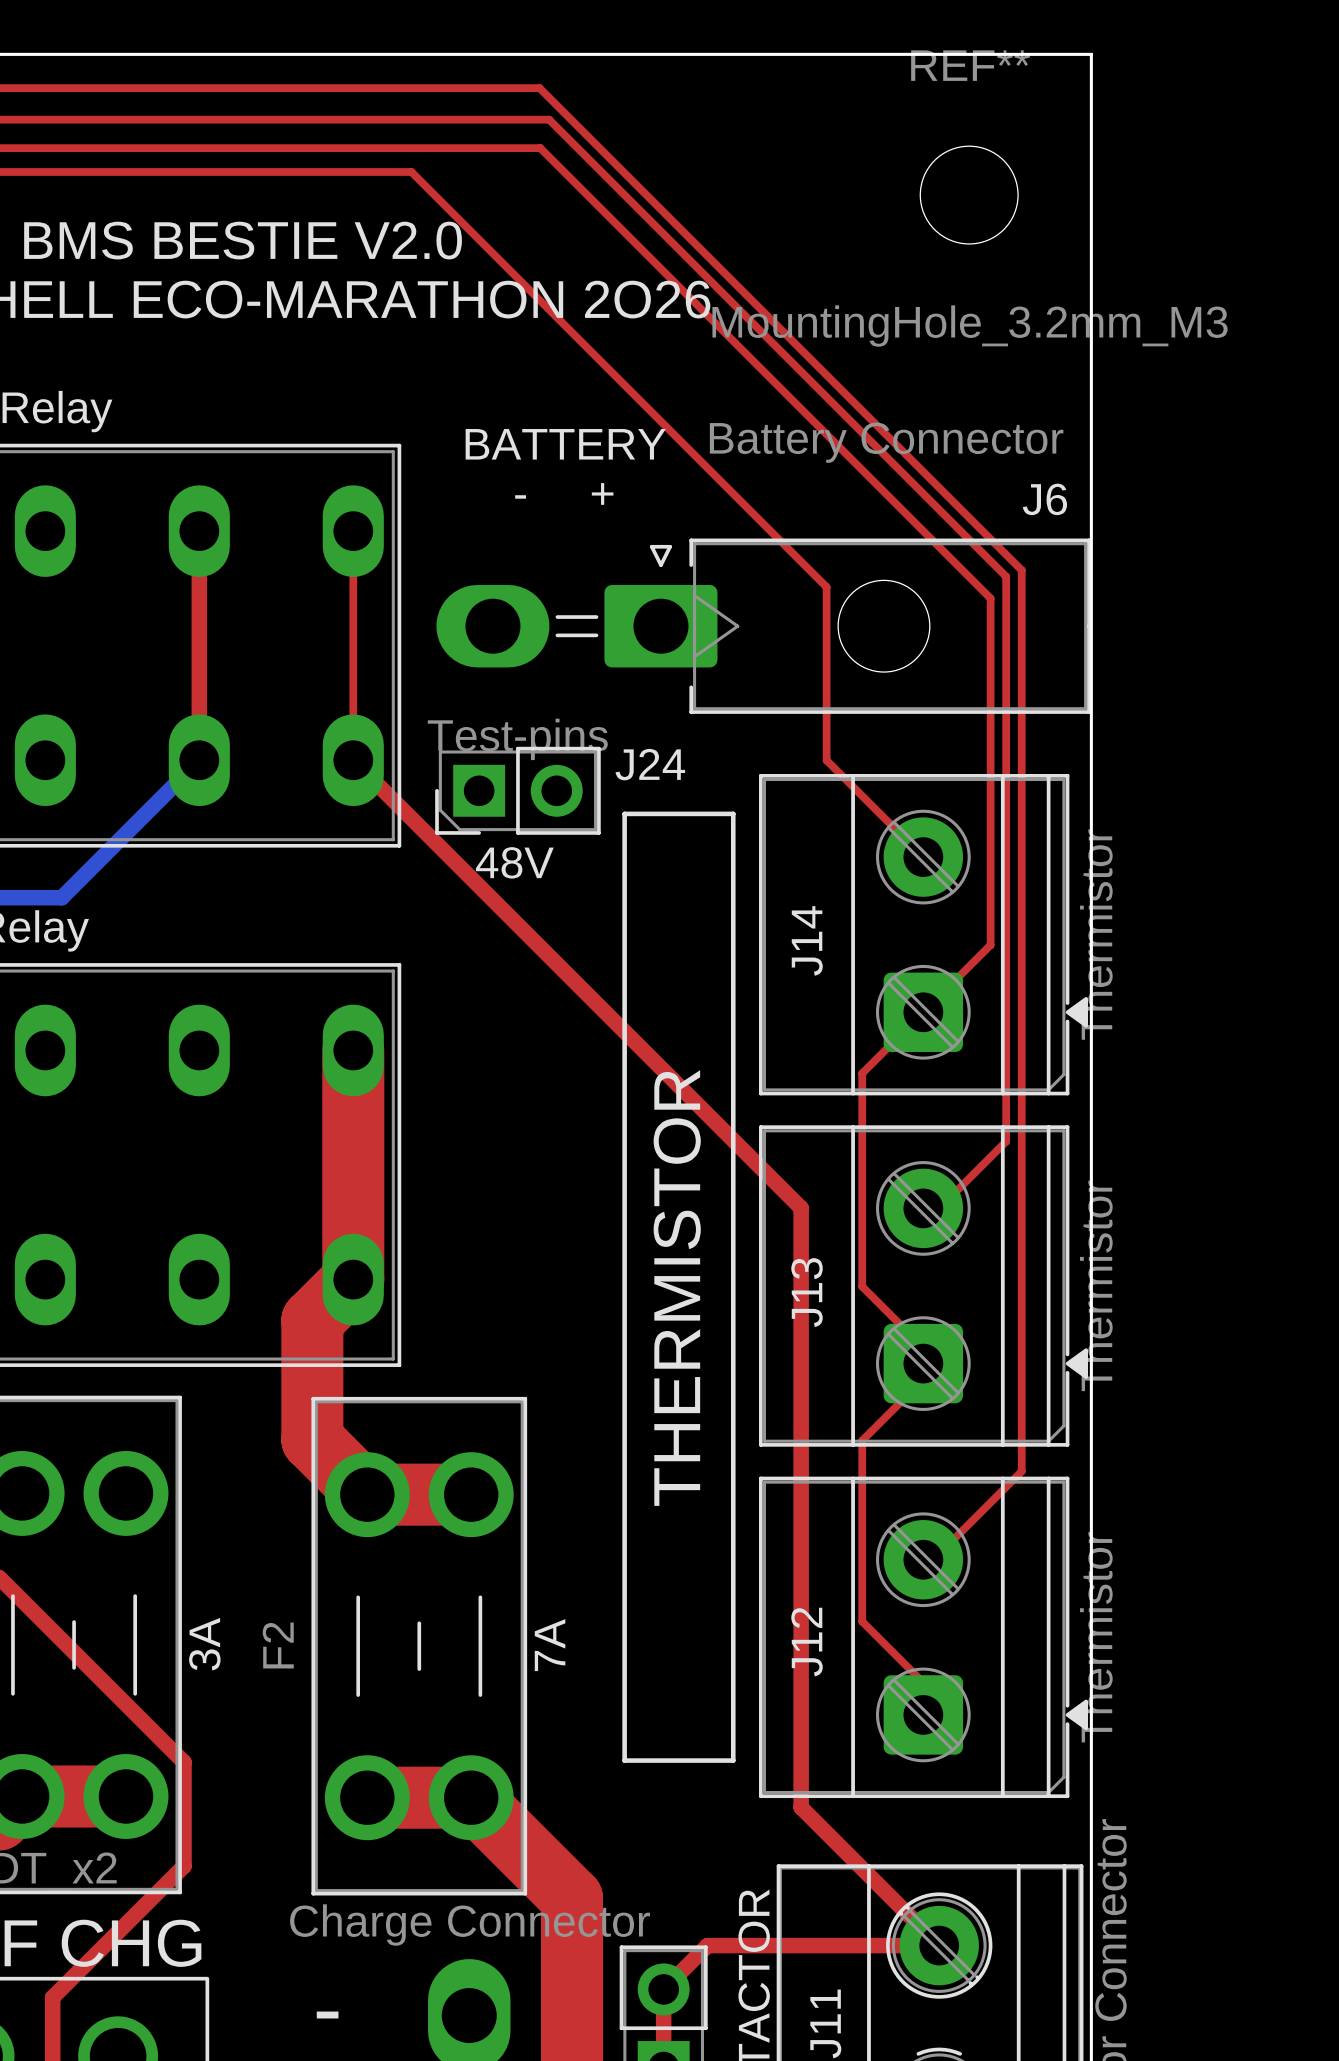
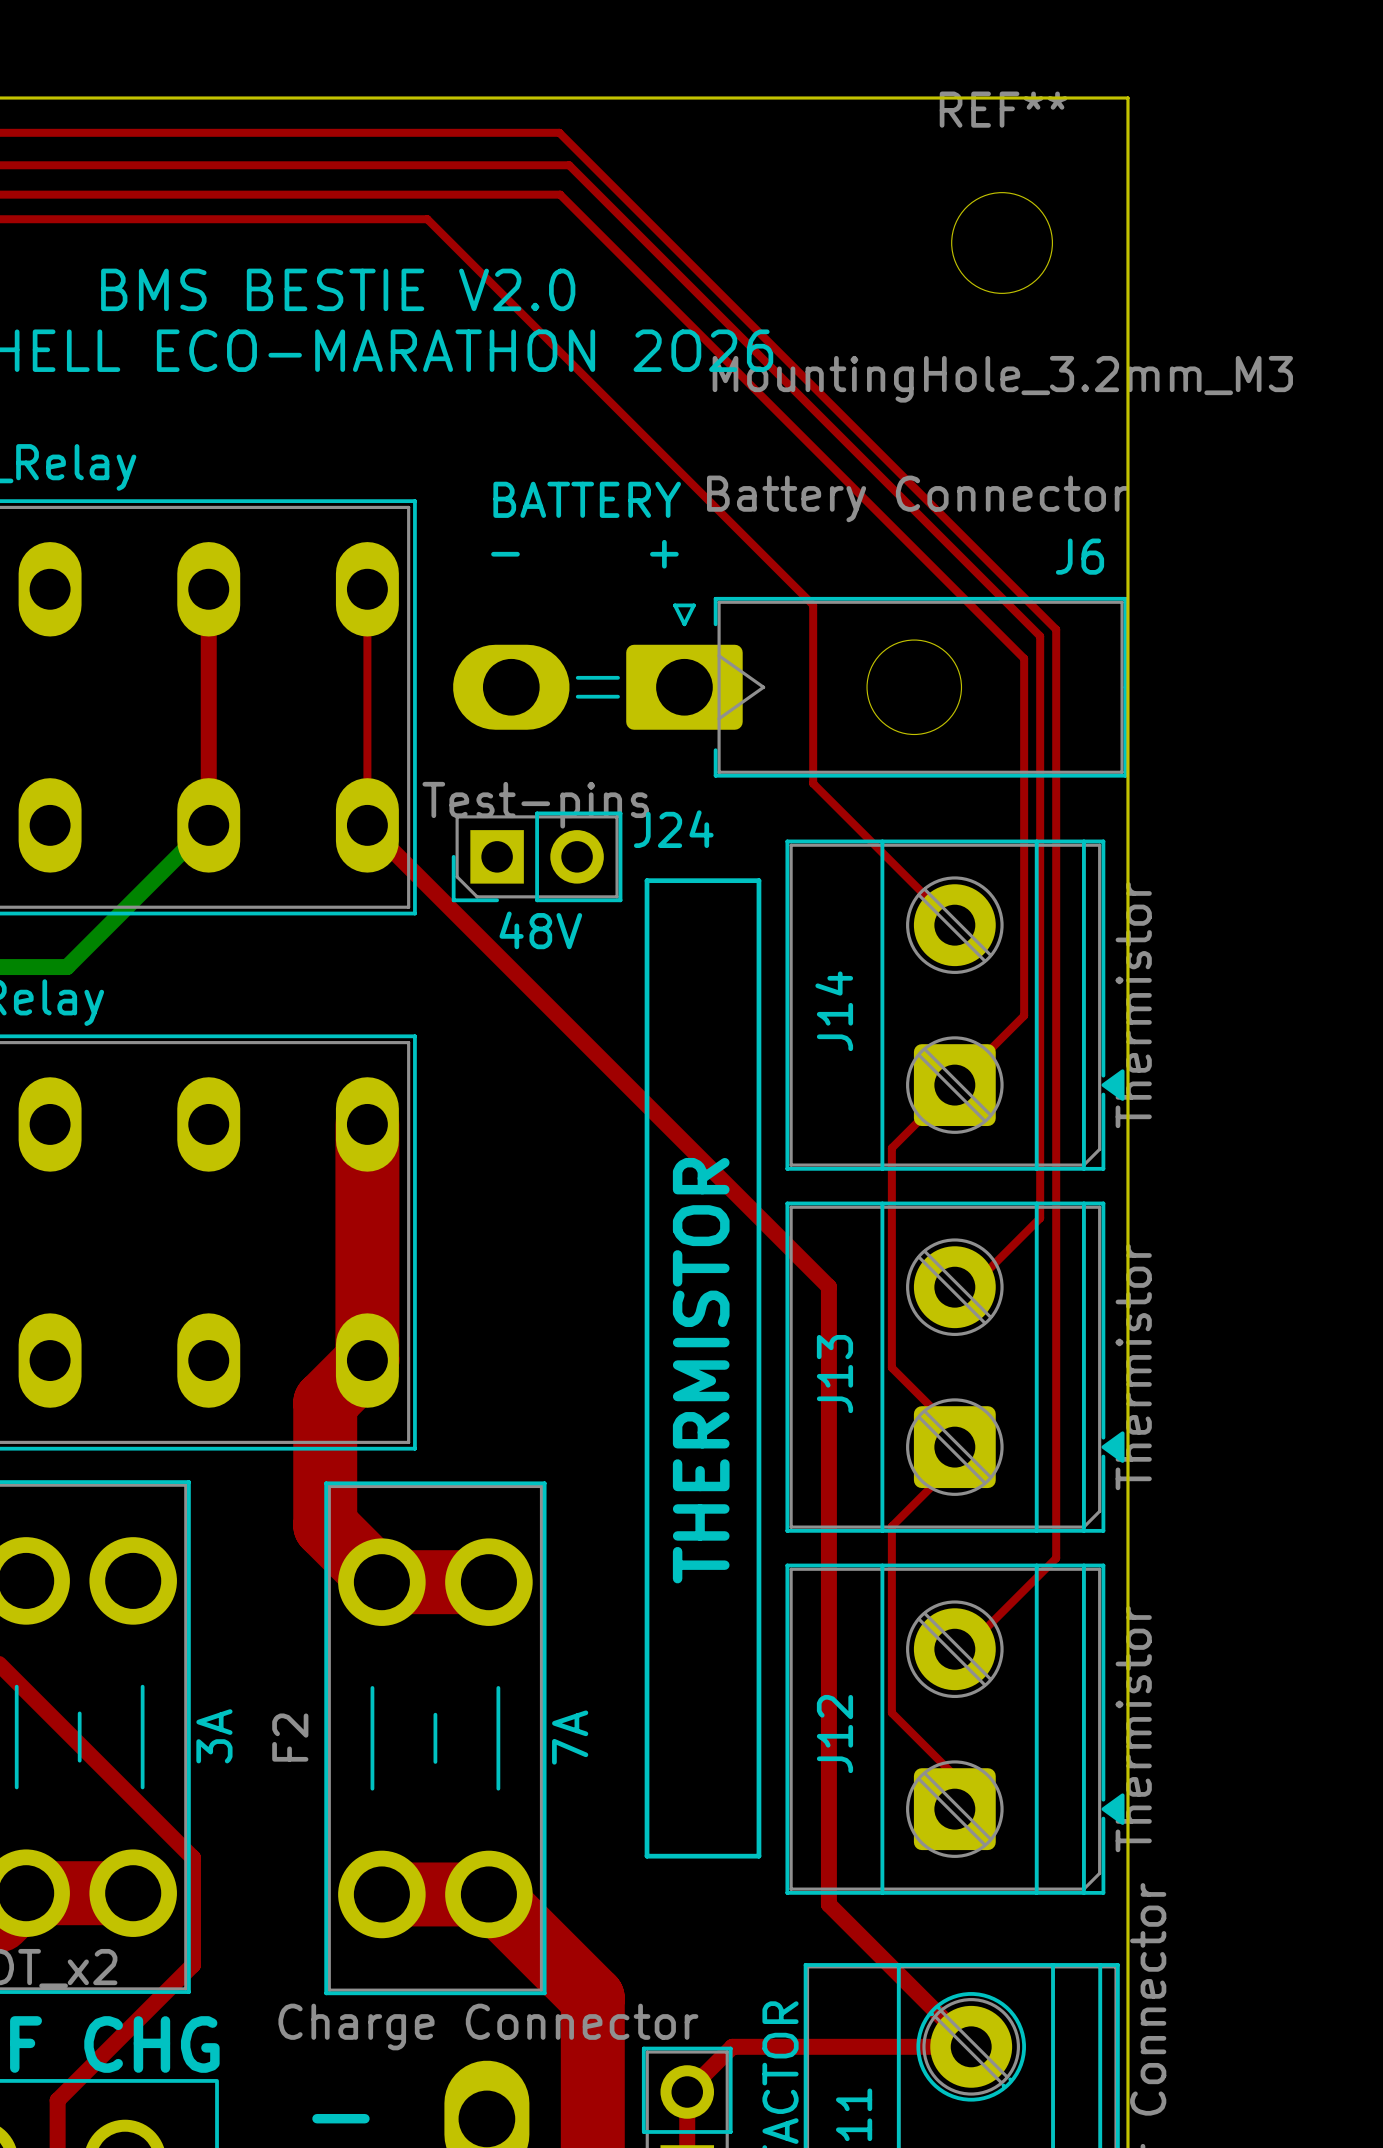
top track: (785, 546) (826, 587) (826, 760) -> (813, 605) (813, 783) (855, 825)

